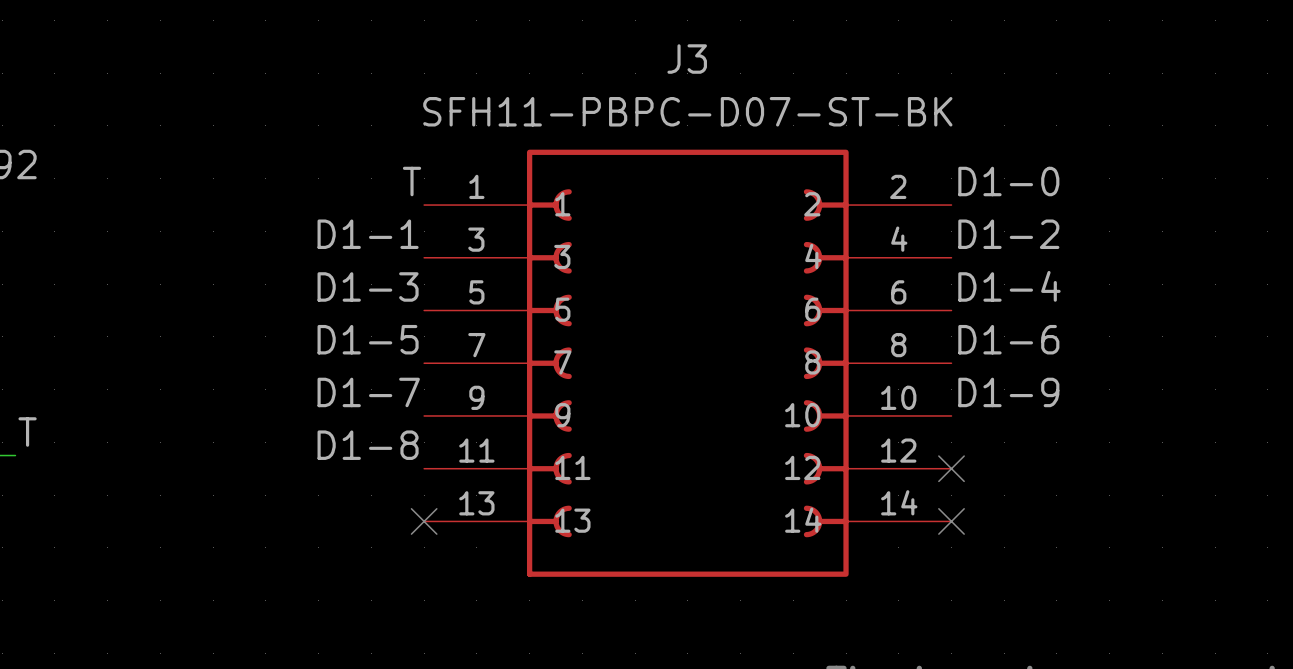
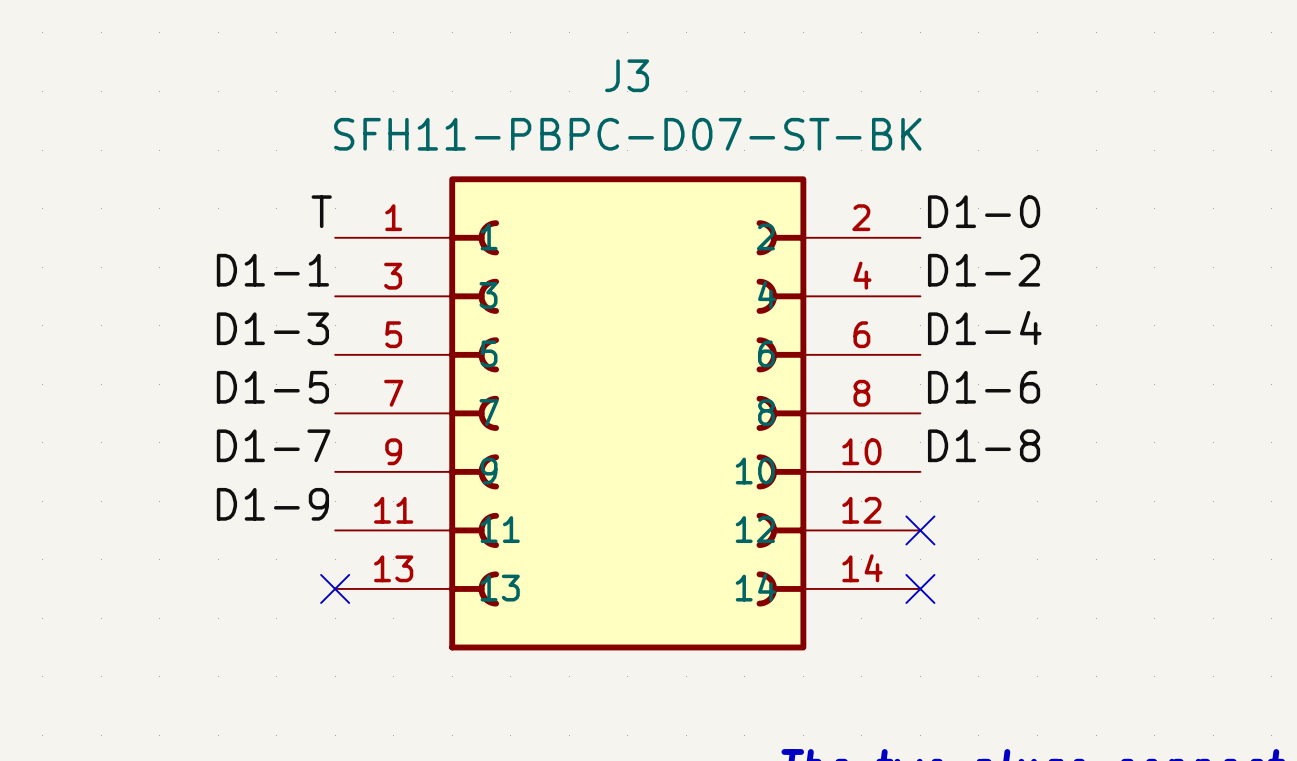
label: D1-9 (1008, 392) -> D1-8 (984, 445)
label: D1-8 (368, 445) -> D1-9 (272, 504)

